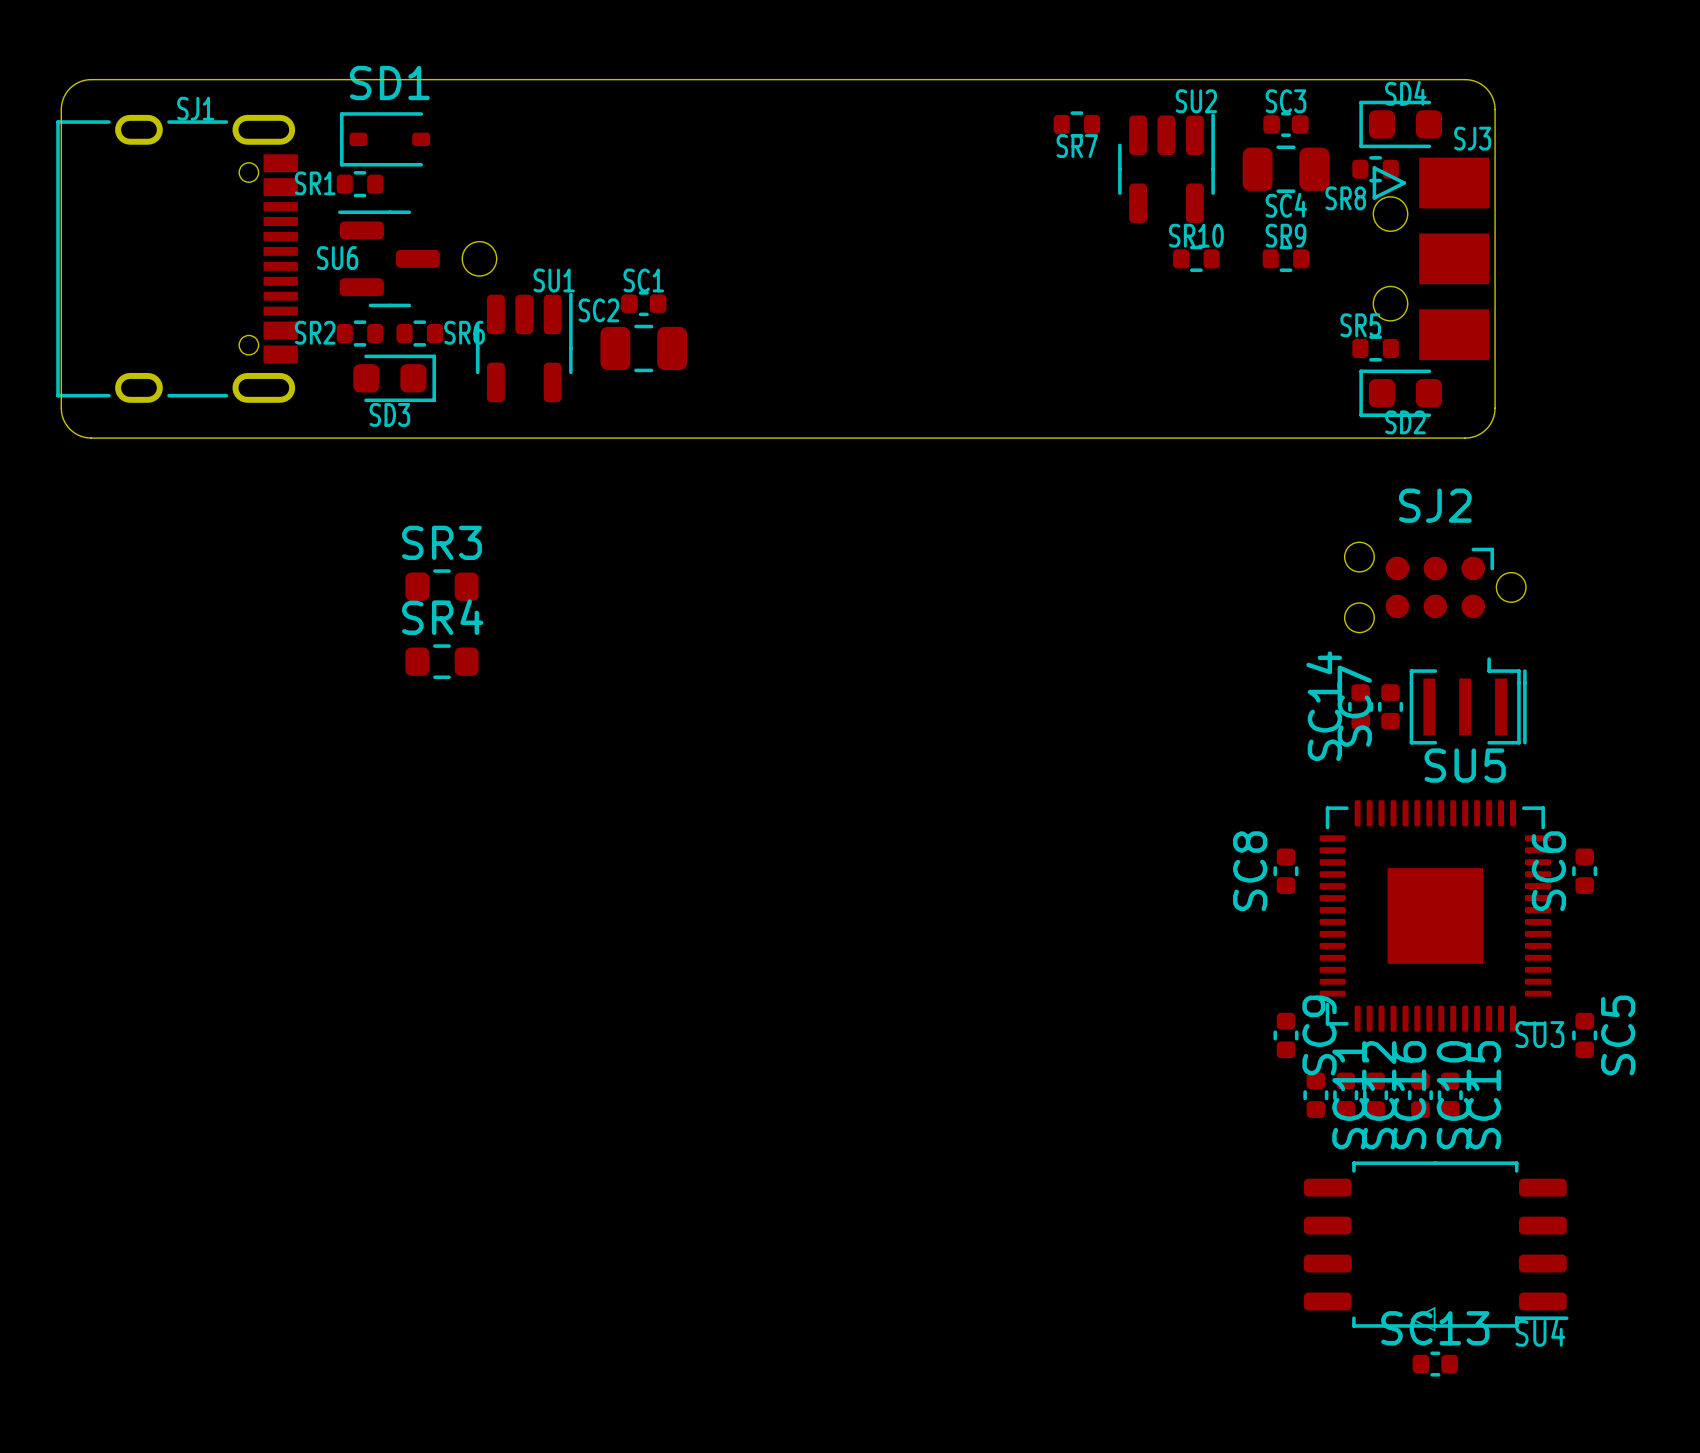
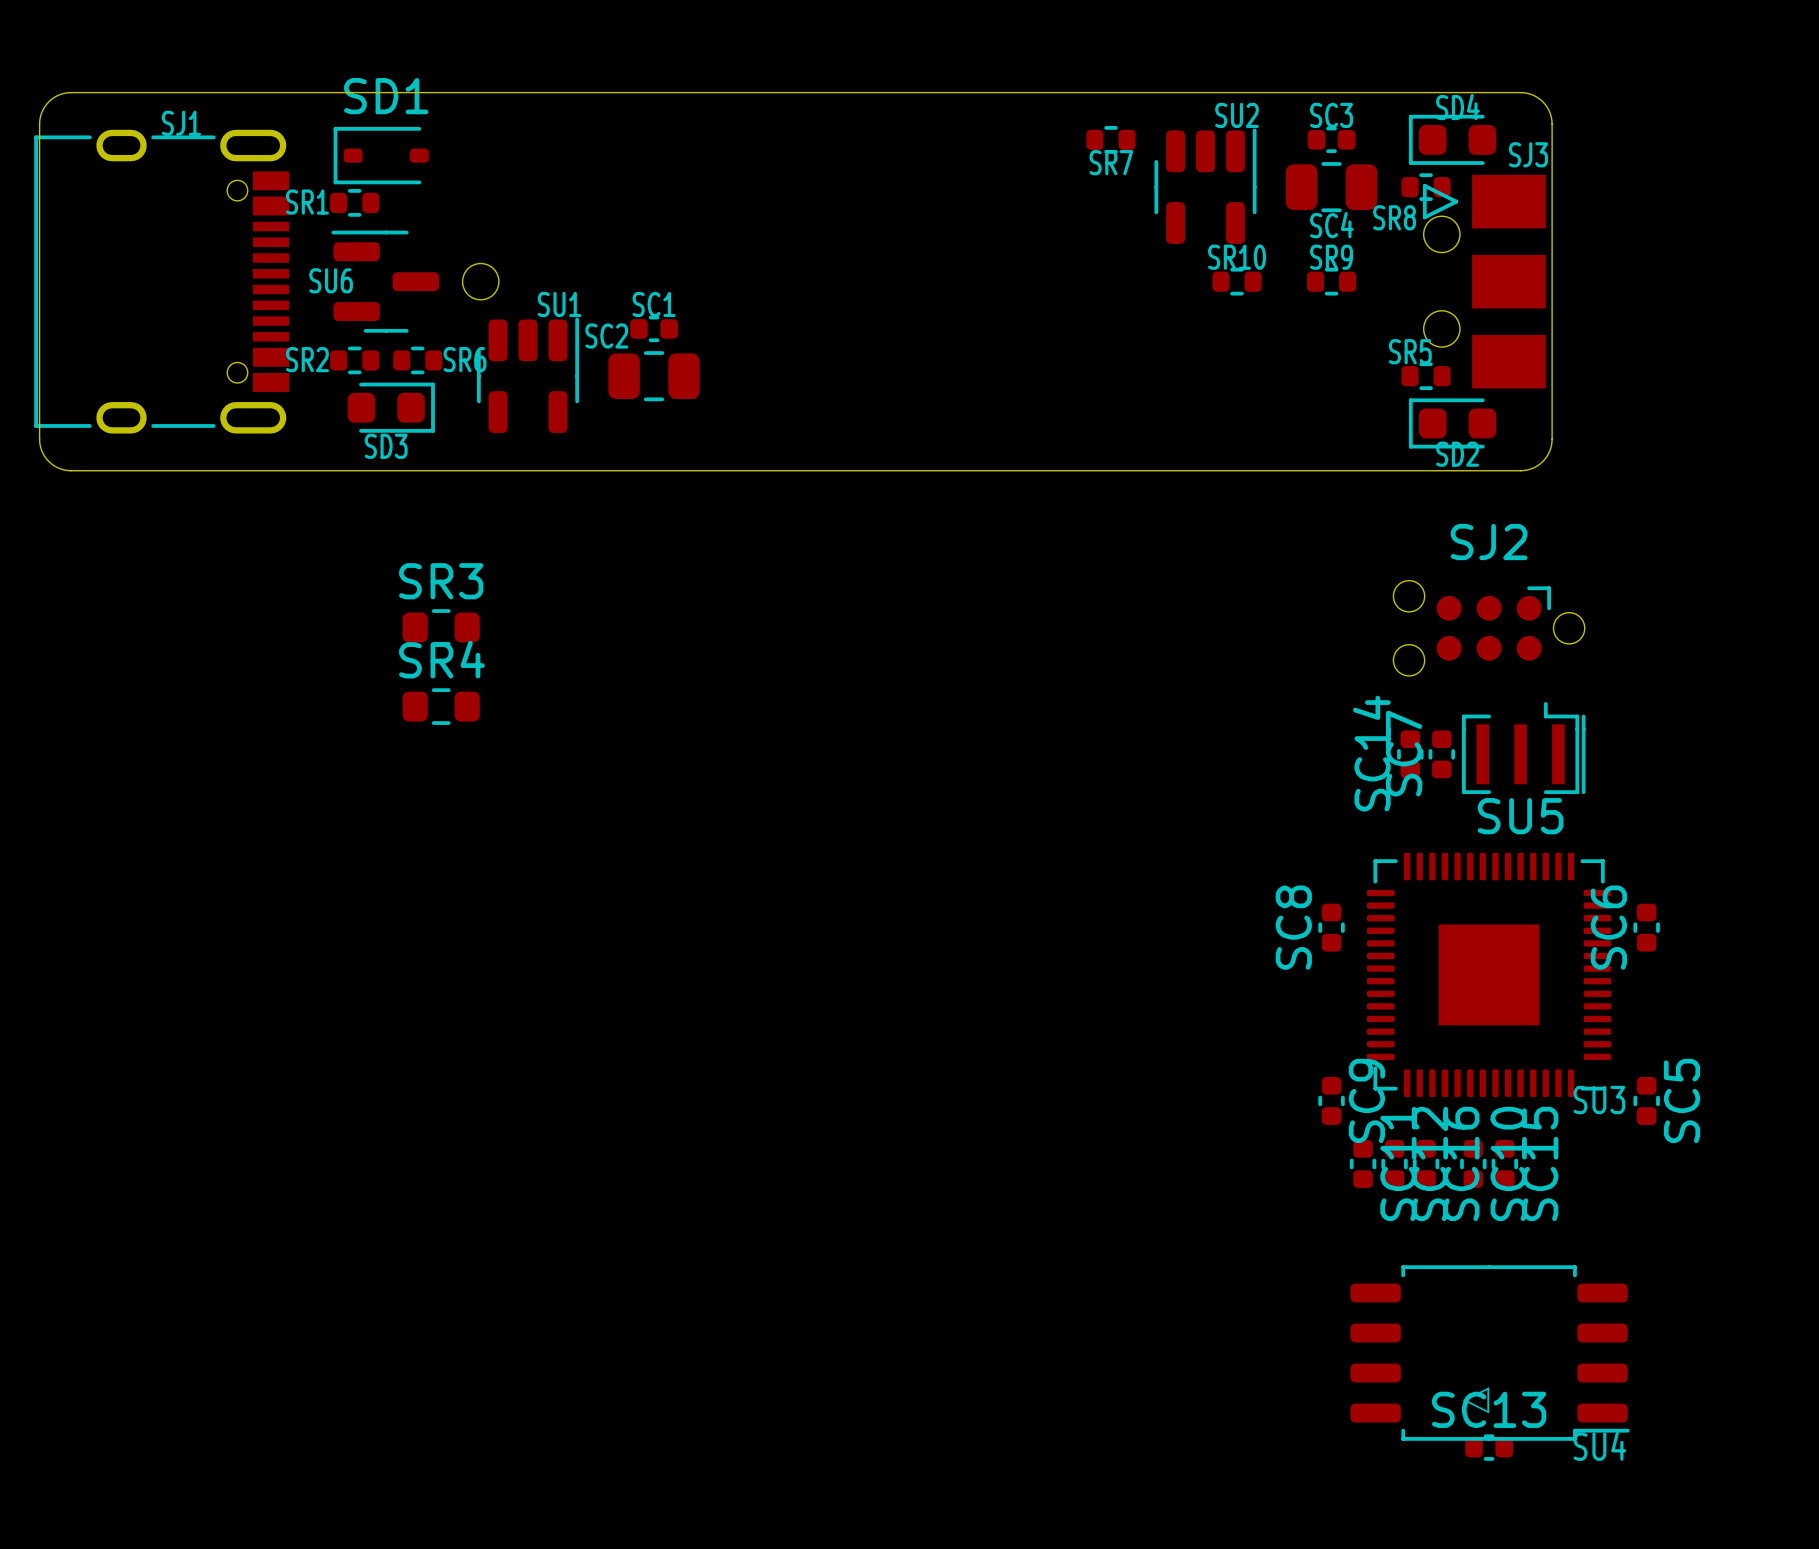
SU4 position: (1436, 1244) -> (1490, 1353)

